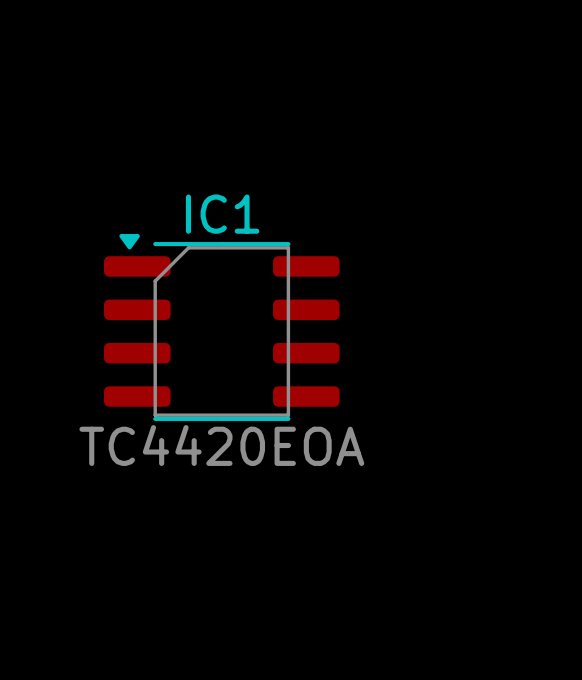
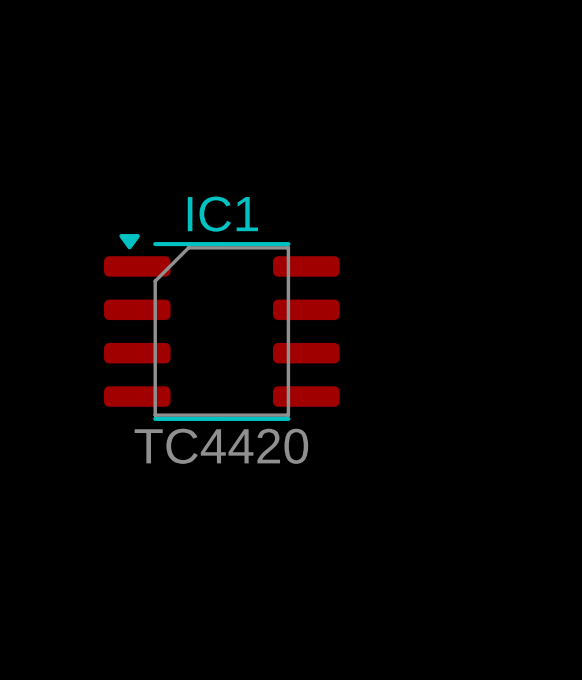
IC1 value: TC4420EOA (221, 445) -> TC4420 (221, 446)

